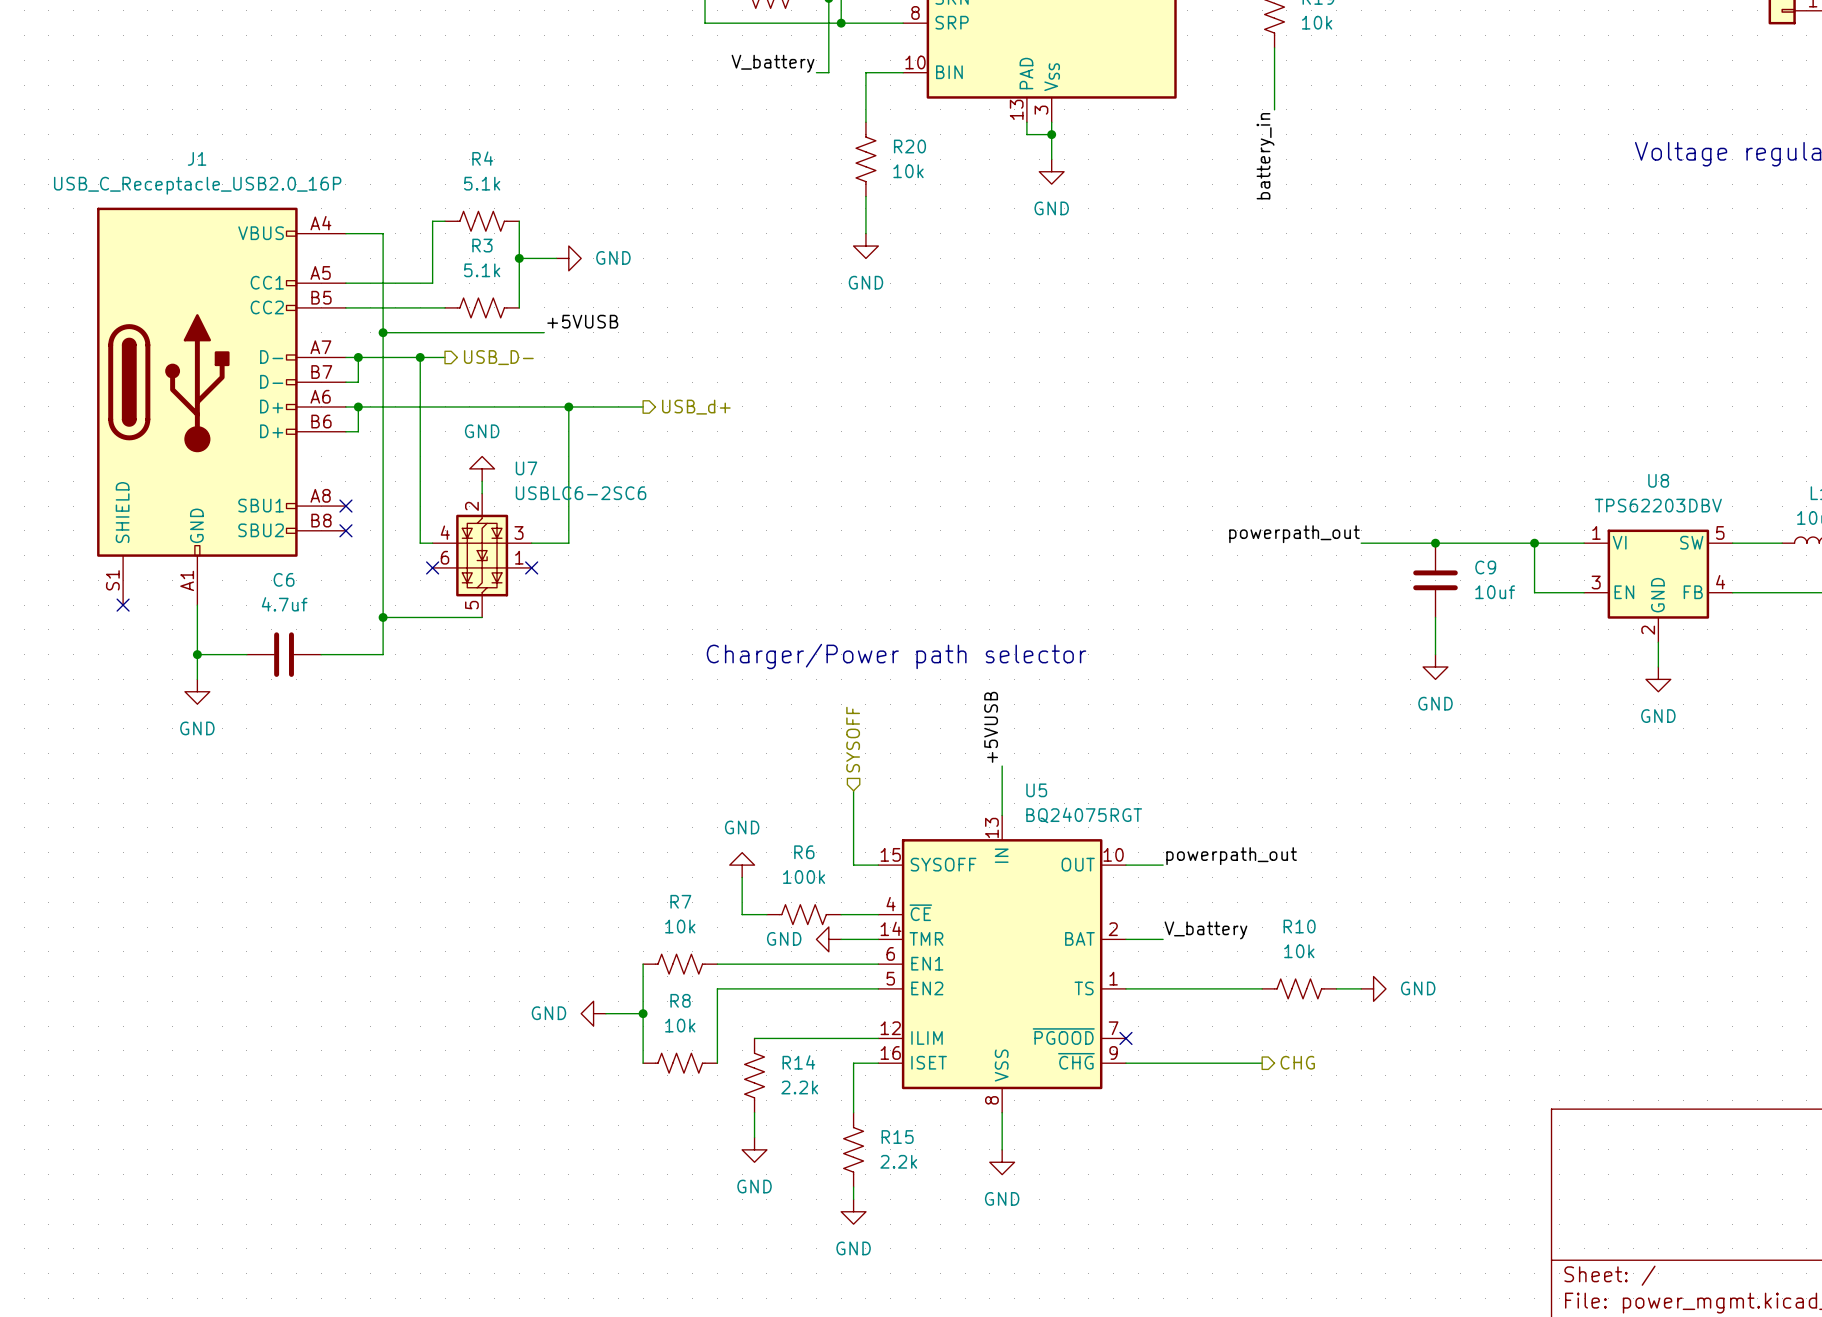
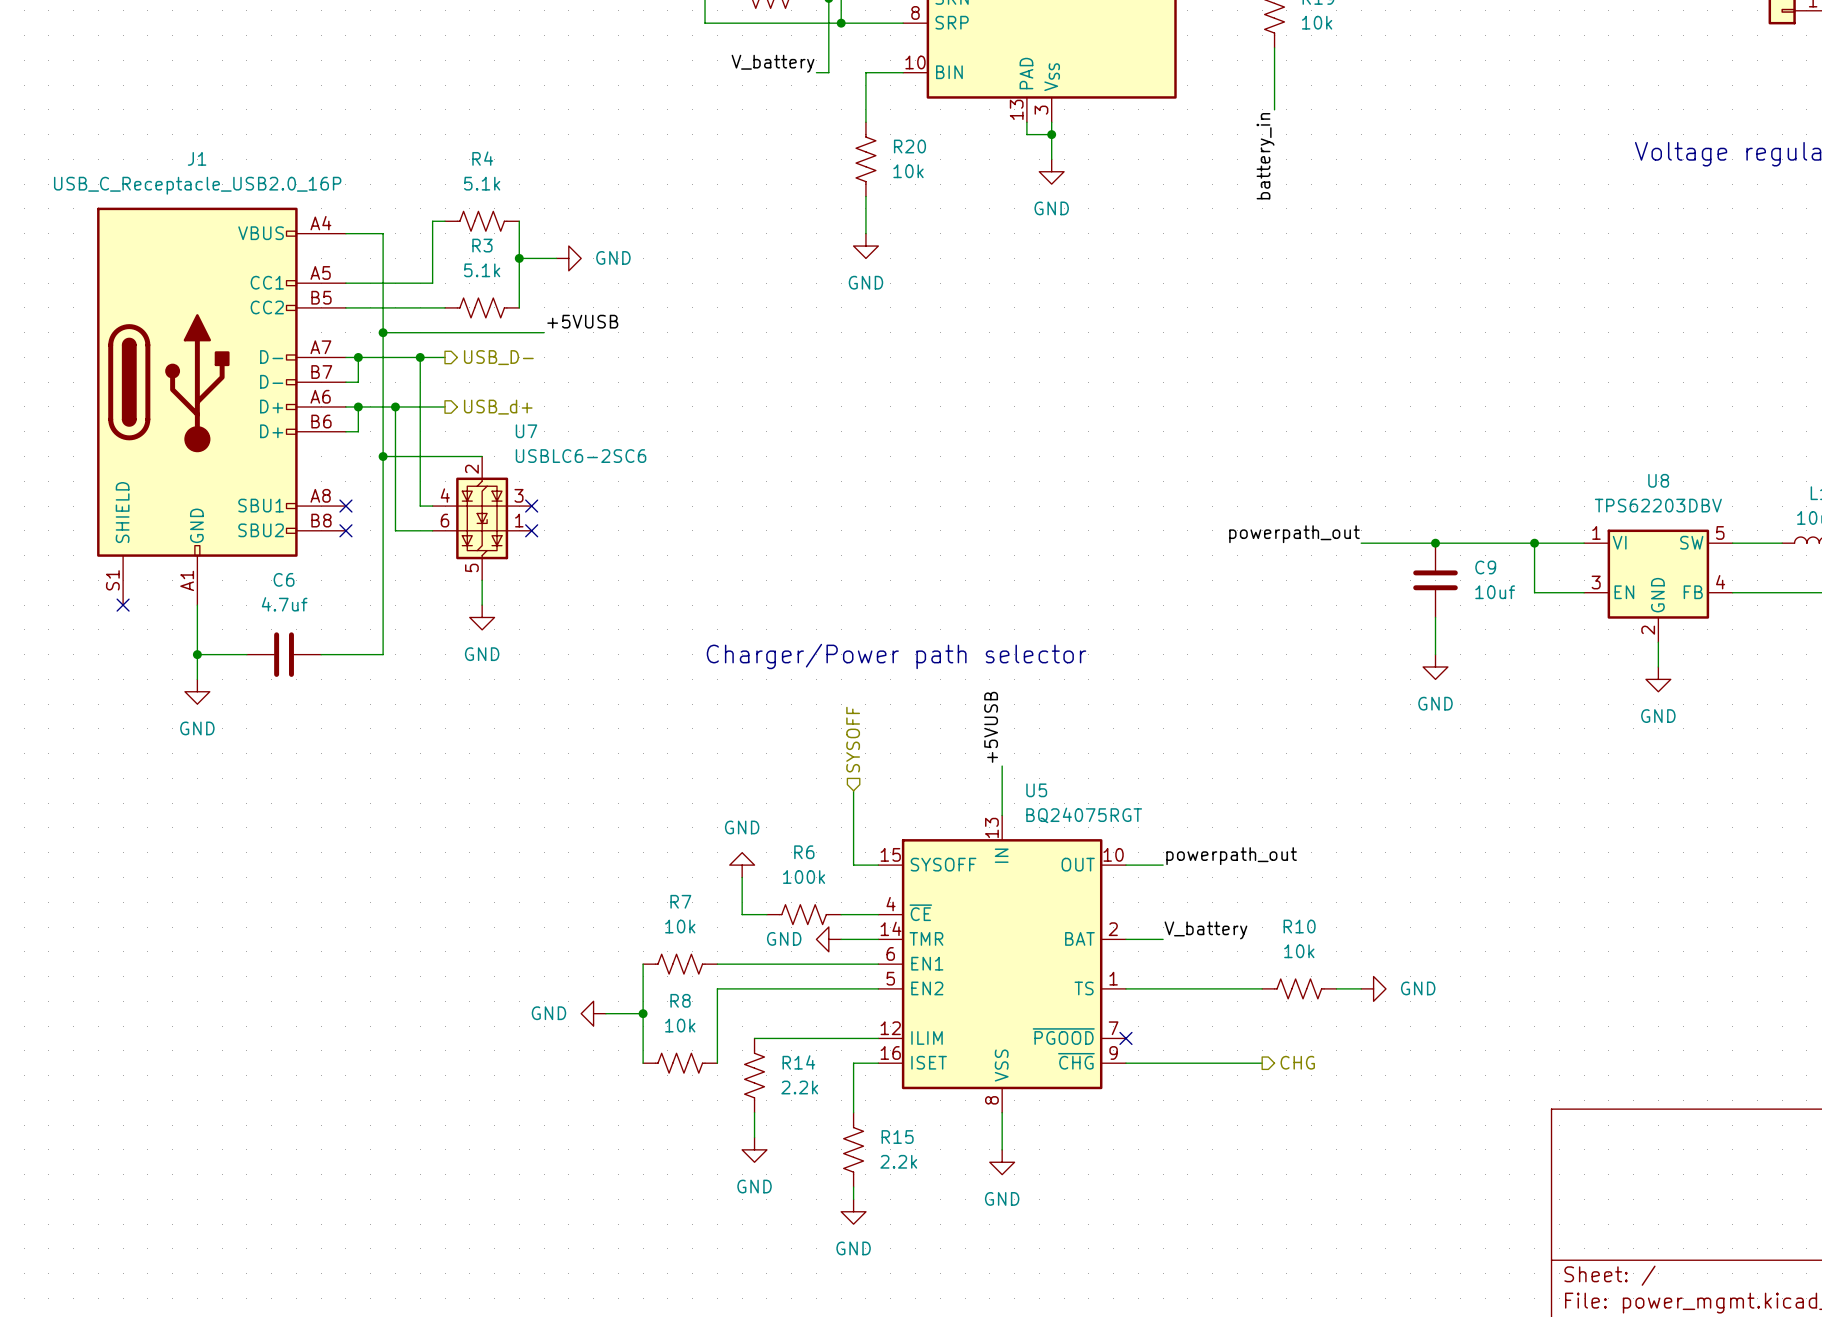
wire: none -> (395, 406) (395, 530) (432, 530)
junction: none -> (395, 406)
wire: (445, 406) (643, 406) -> none
wire: (568, 406) (568, 543) (531, 543) -> none
junction: (568, 406) -> none
hierarchical label position: USB_d+ (696, 407) -> USB_d+ (498, 407)
junction: none -> (383, 456)
power symbol rotation: 0° (482, 468) -> 180° (482, 617)
power symbol position: GND (482, 468) -> GND (482, 617)
wire: (420, 506) (420, 543) (432, 543) -> (420, 506) (432, 506)
no-connect mark: none -> (531, 506)
no-connect mark: none -> (531, 530)
U7 position: (482, 555) -> (482, 518)
no-connect mark: (432, 567) -> none
no-connect mark: (531, 567) -> none
wire: (383, 617) (482, 617) -> (383, 456) (482, 456)
junction: (383, 617) -> none

